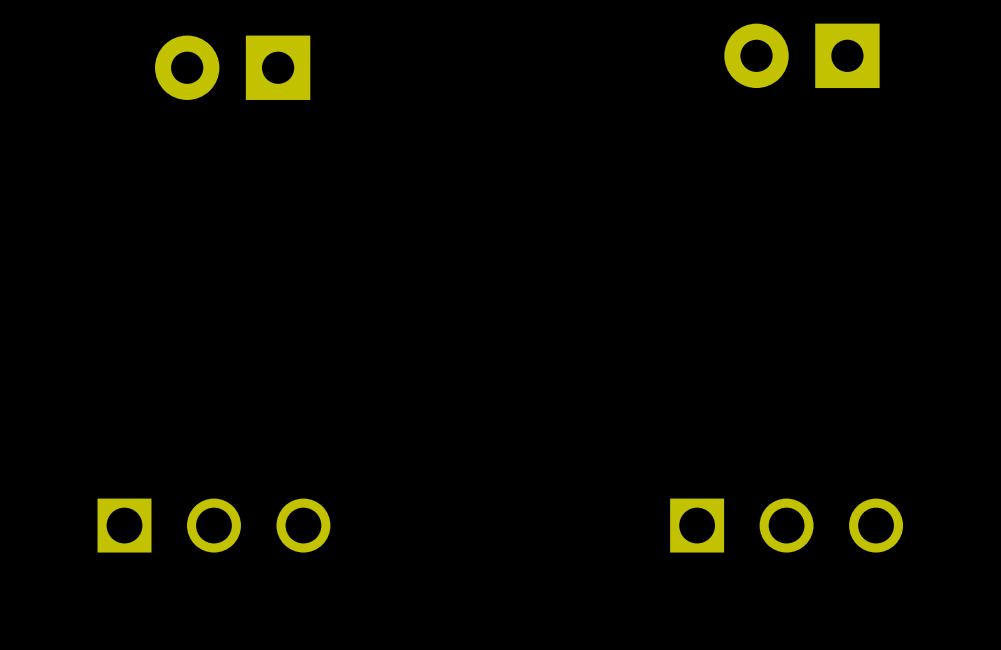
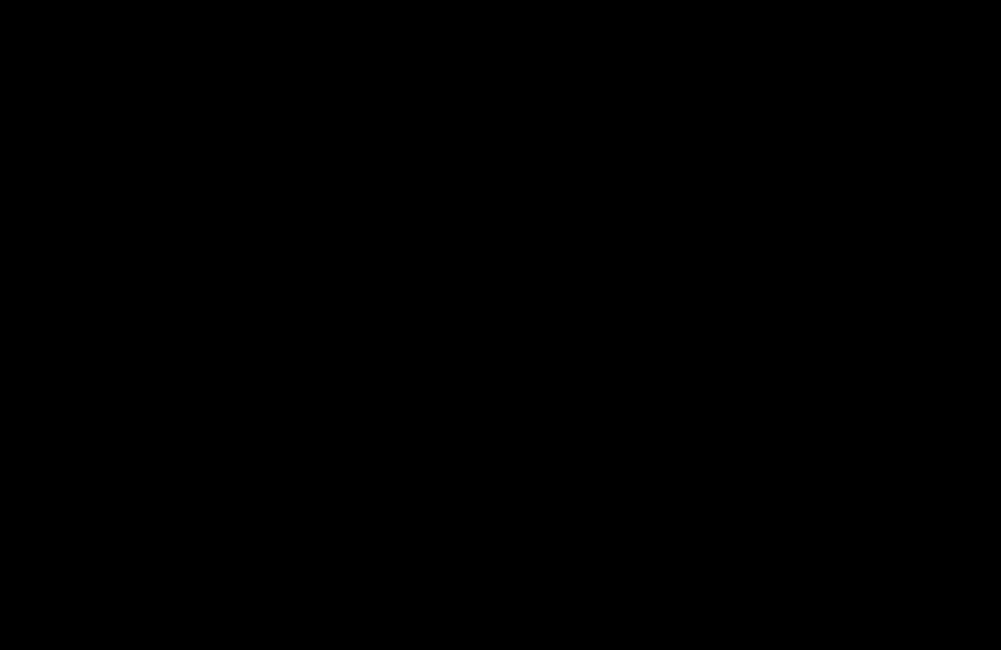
part: (801, 55) -> none
part: (232, 67) -> none
part: (213, 525) -> none
part: (786, 525) -> none

